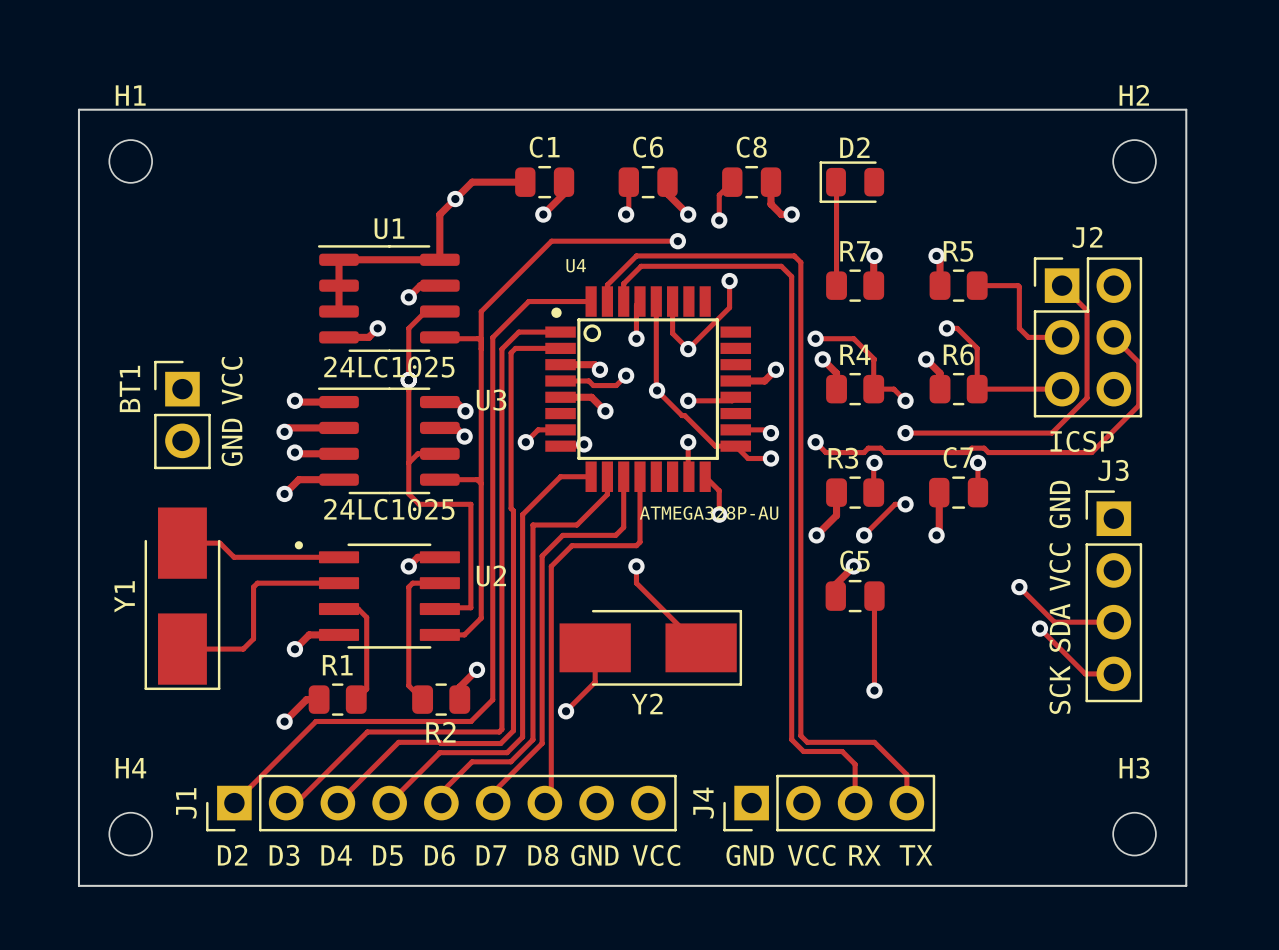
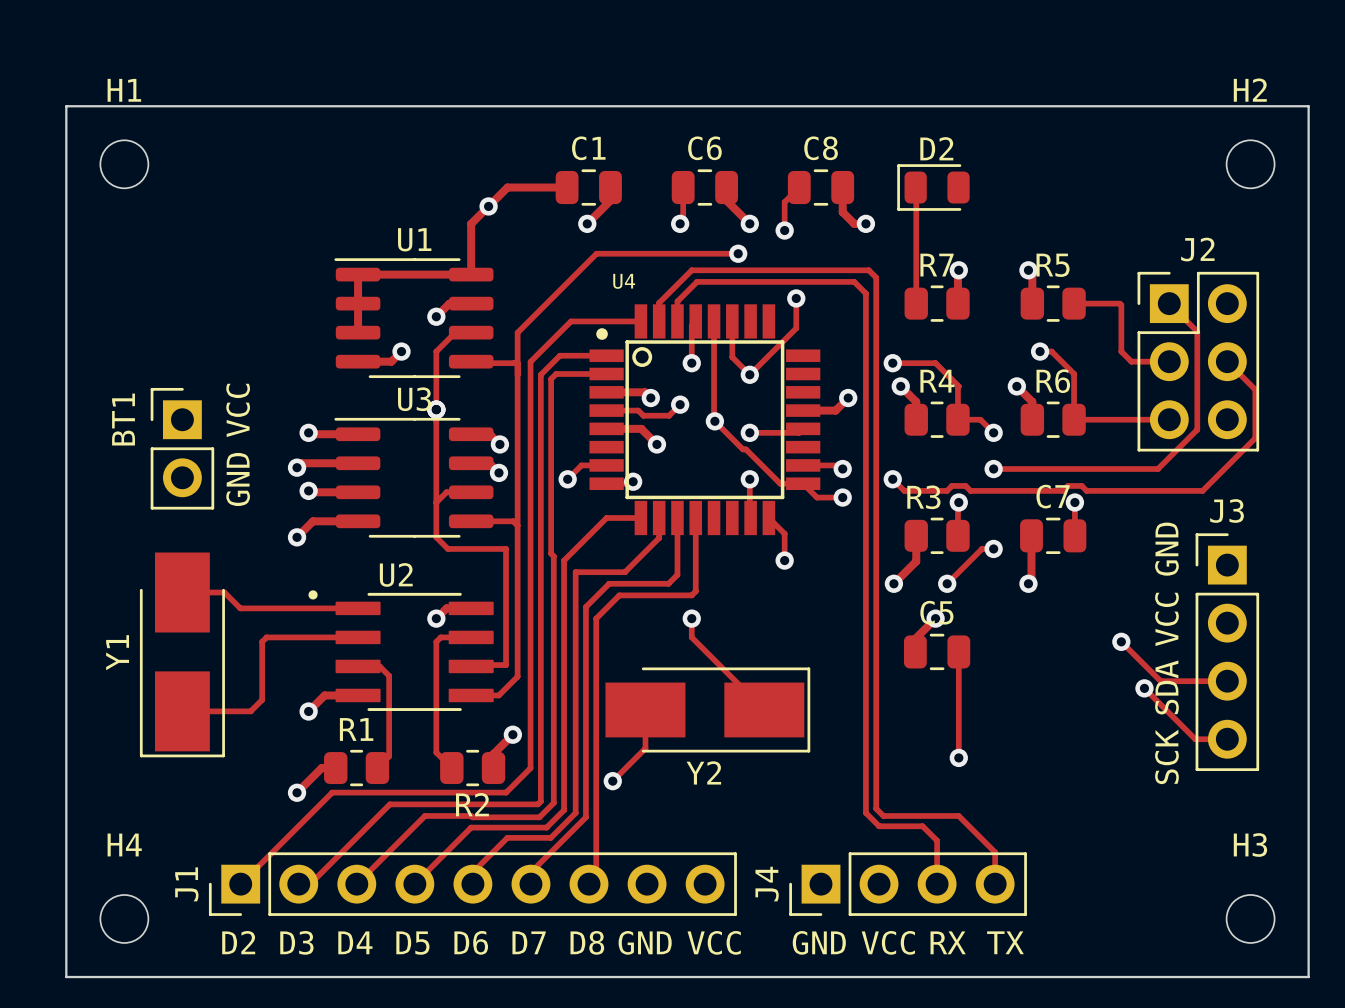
U1 value: 24LC1025 (389, 367) -> none
U3 name position: U3 (491, 400) -> U3 (414, 399)
text: ICSP (1082, 441) -> none
U3 value: 24LC1025 (389, 509) -> none
U4 value: ATMEGA328P-AU (709, 513) -> none
U2 name position: U2 (491, 576) -> U2 (396, 574)

